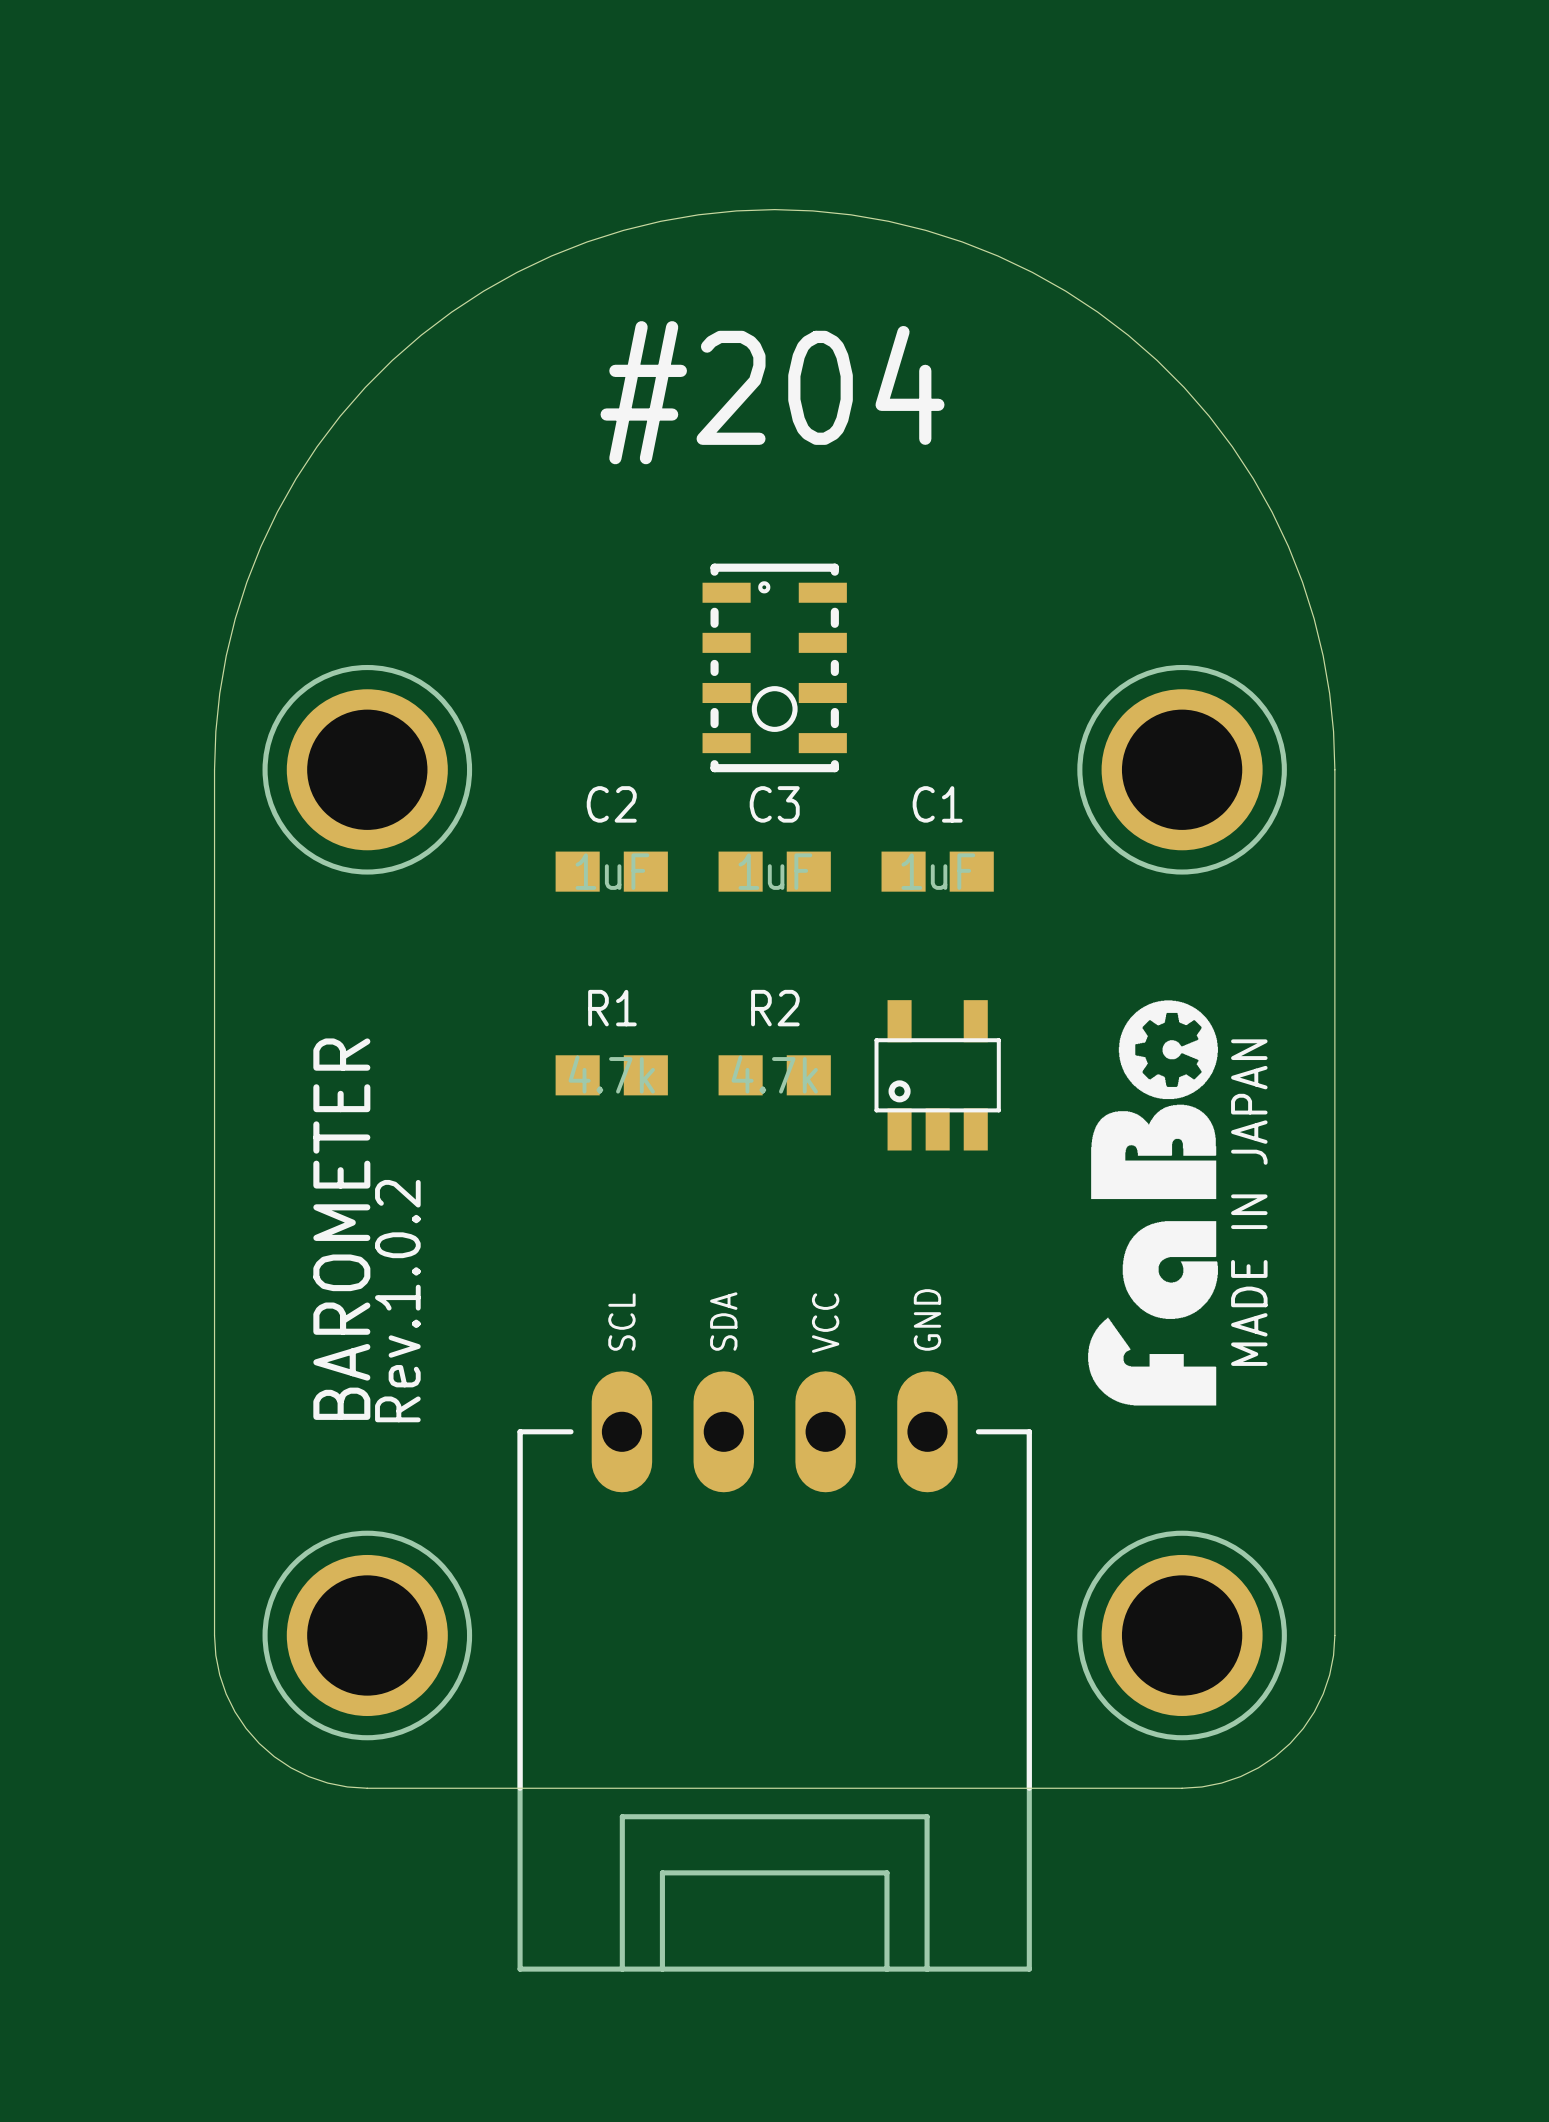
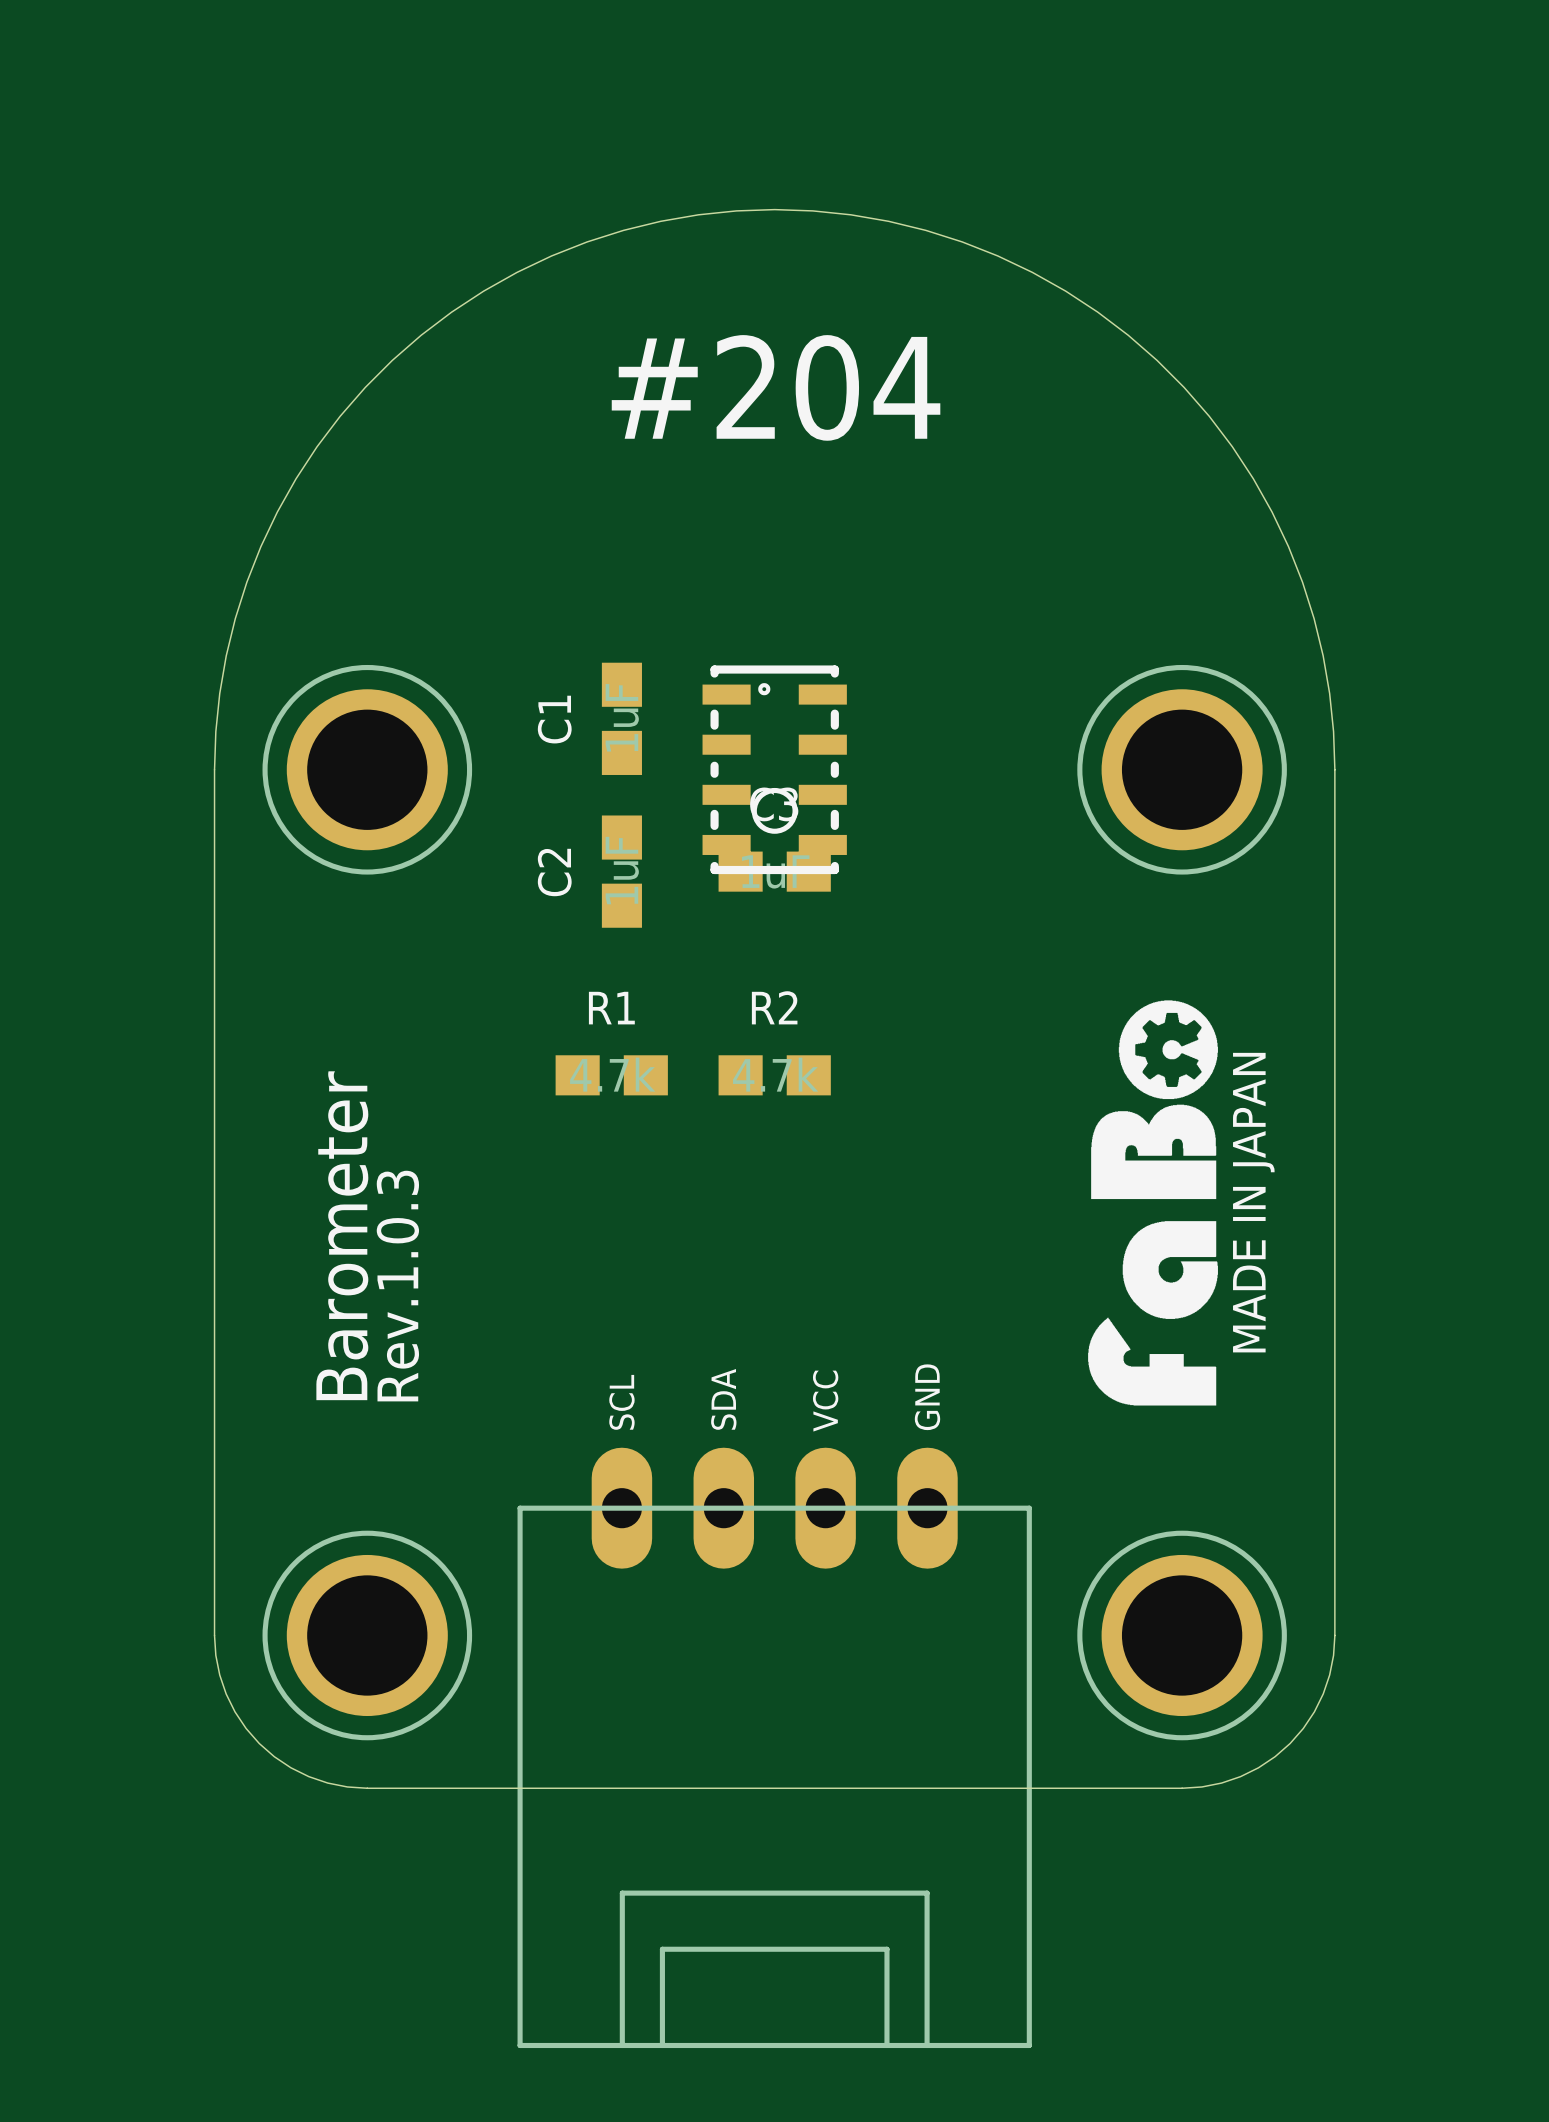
part footprint: [214, 209, 1335, 1972] -> [214, 209, 1335, 2049]
part position: (774, 667) -> (774, 769)
C2 name position: C2 (611, 804) -> C2 (554, 872)
C1 name position: C1 (937, 804) -> C1 (554, 719)
C2 rotation: 0° (611, 871) -> 90° clockwise (621, 871)
C1 rotation: 0° (937, 871) -> 90° clockwise (621, 718)
C1 position: (937, 871) -> (621, 718)
part: (937, 1075) -> none
text: BAROMETER (341, 1229) -> Barometer (342, 1235)
text: Rev.1.0.2 (397, 1301) -> Rev.1.0.3 (397, 1286)

